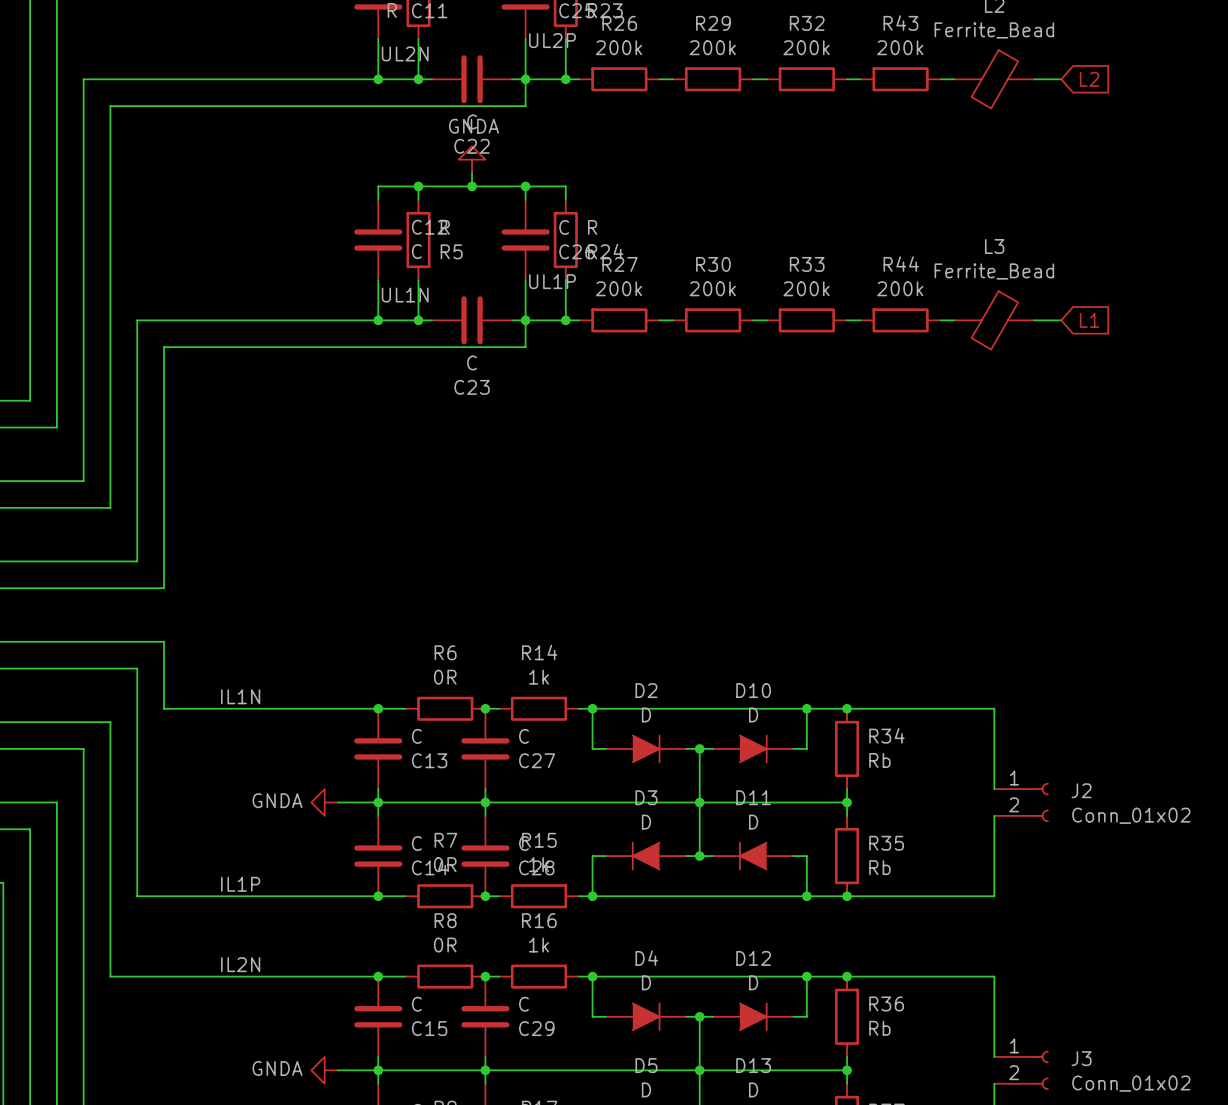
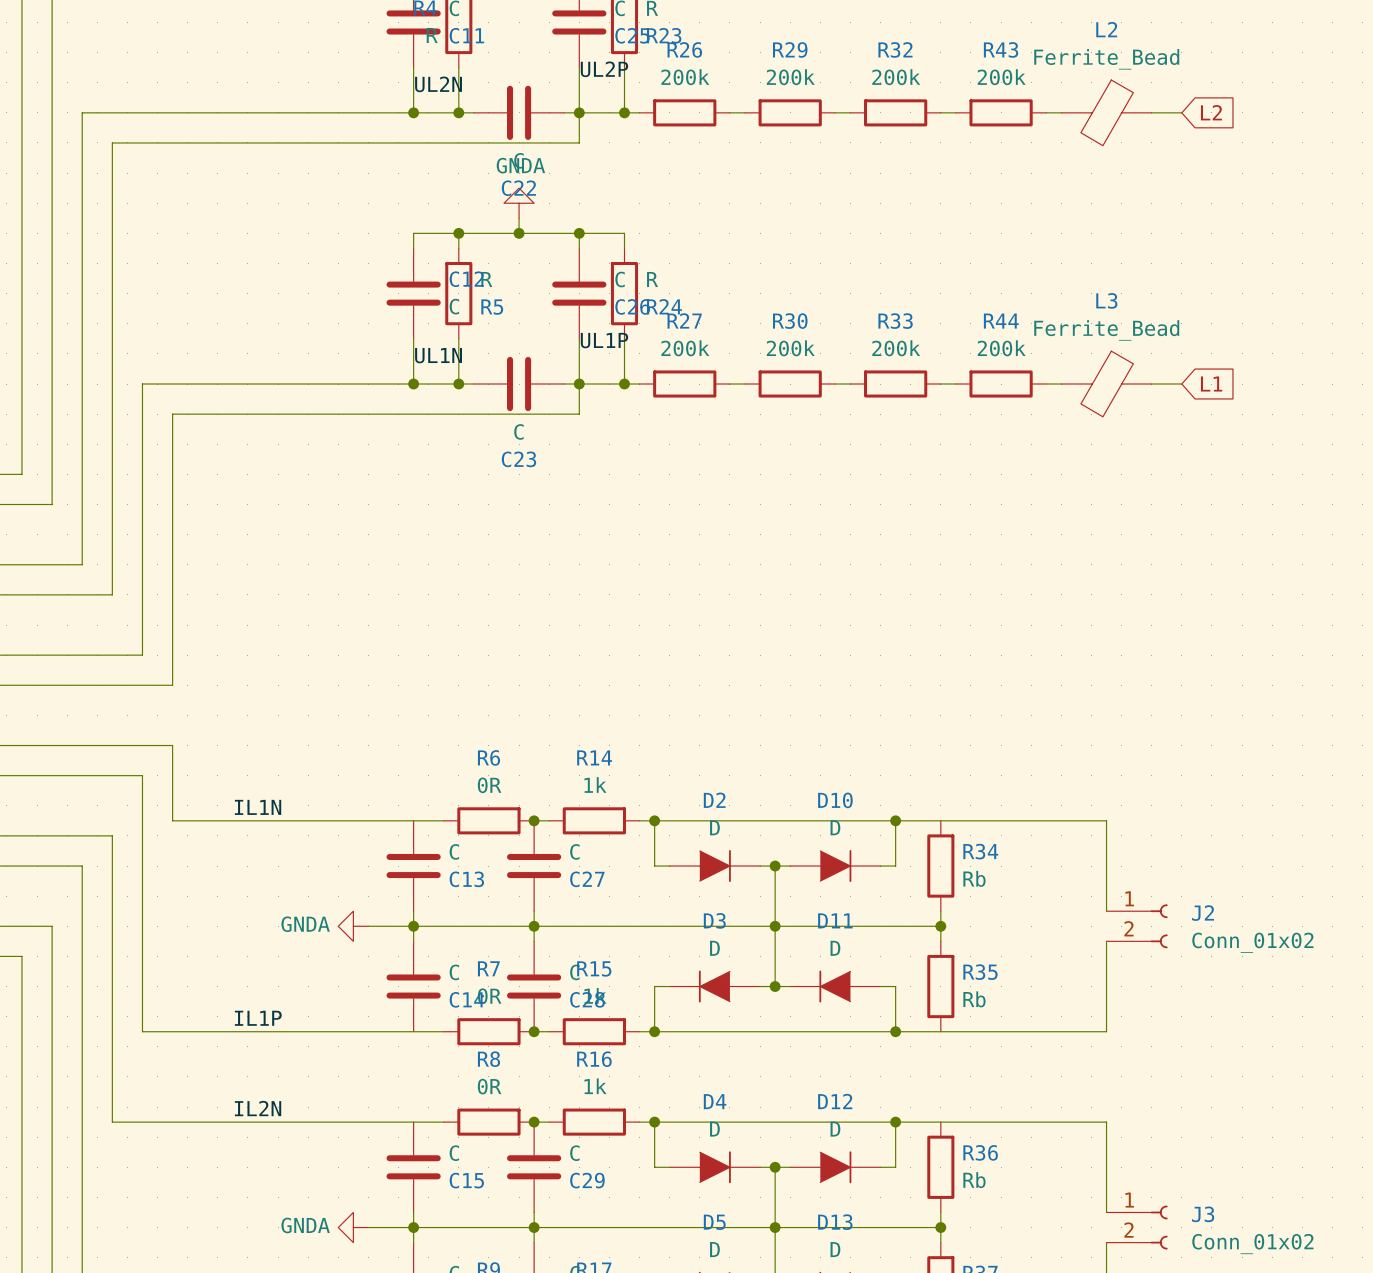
junction: (378, 708) -> none
junction: (847, 708) -> none
junction: (378, 896) -> none
junction: (847, 896) -> none
junction: (378, 976) -> none
junction: (847, 976) -> none

